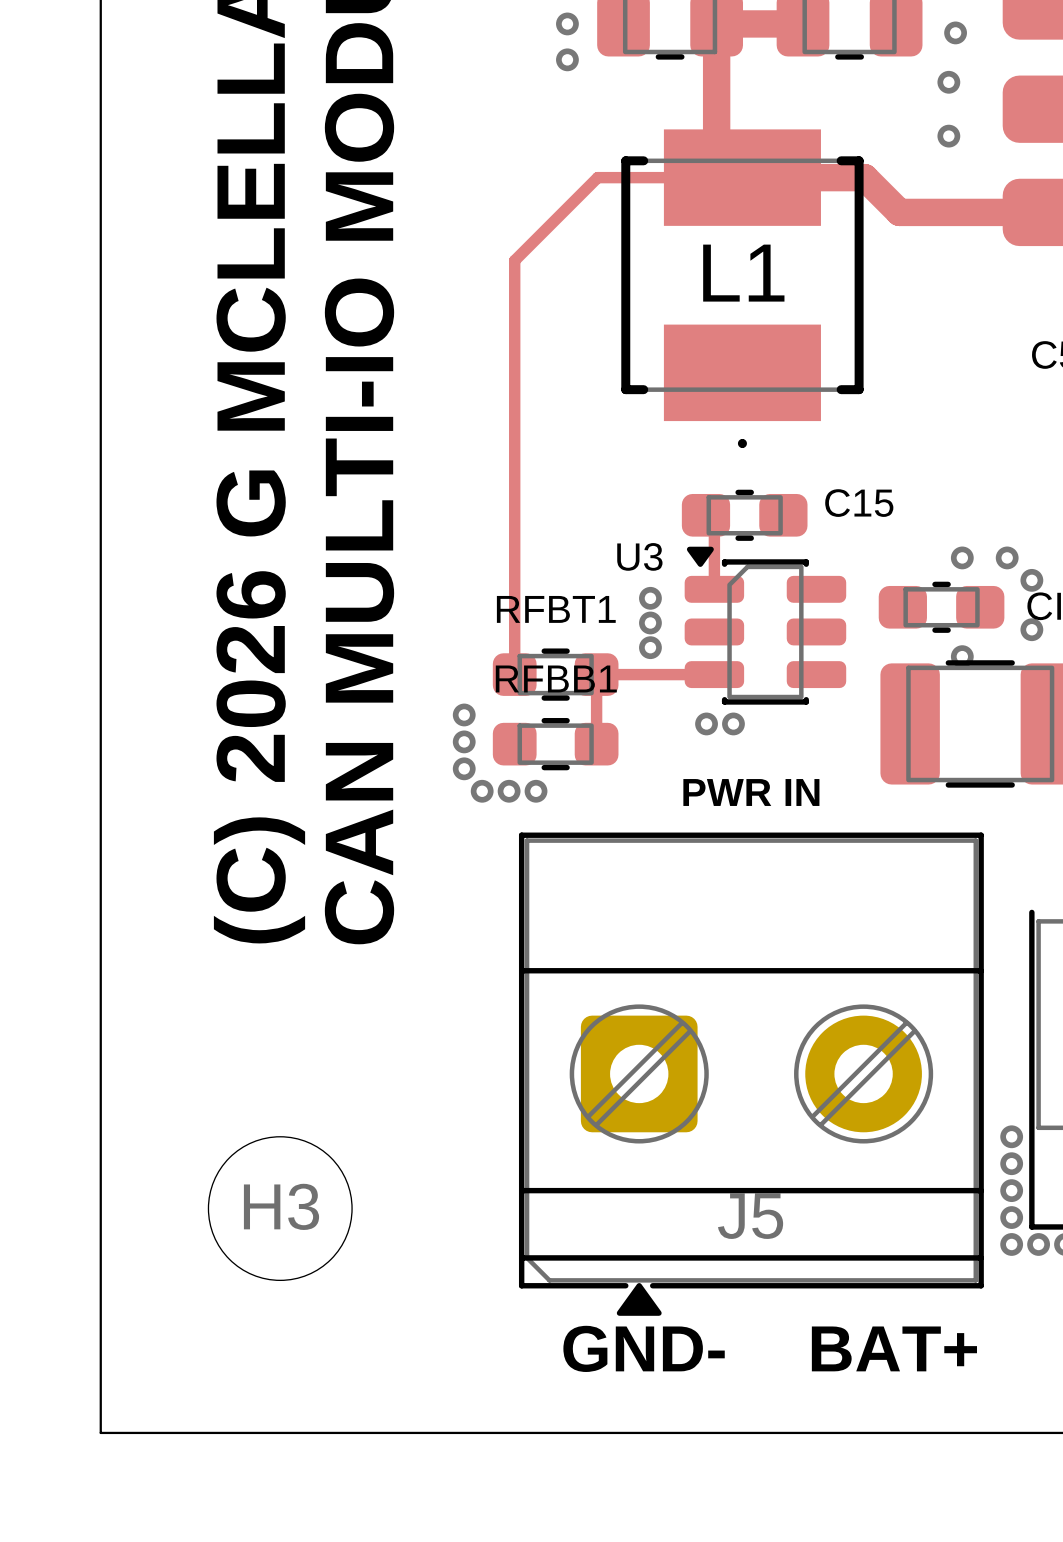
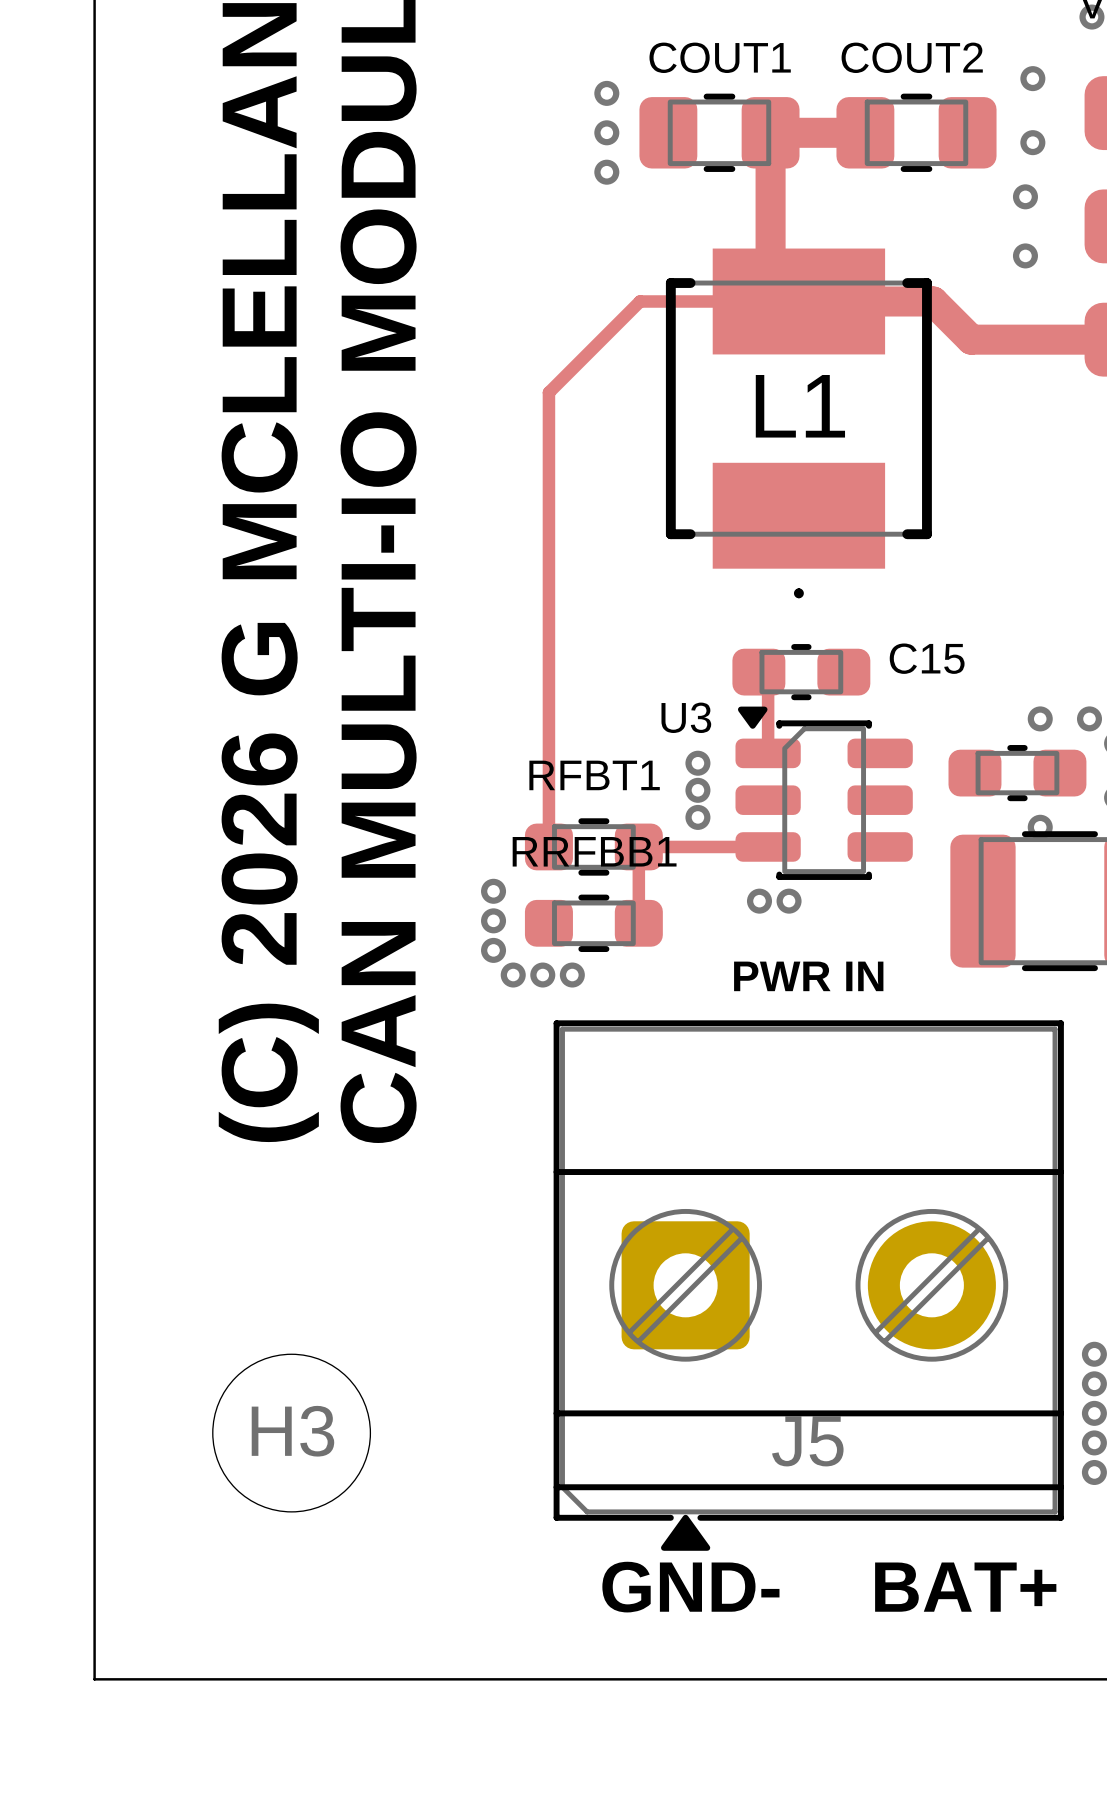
RFBB1 name: RFBB1 (556, 678) -> RRFBB1 (594, 851)

